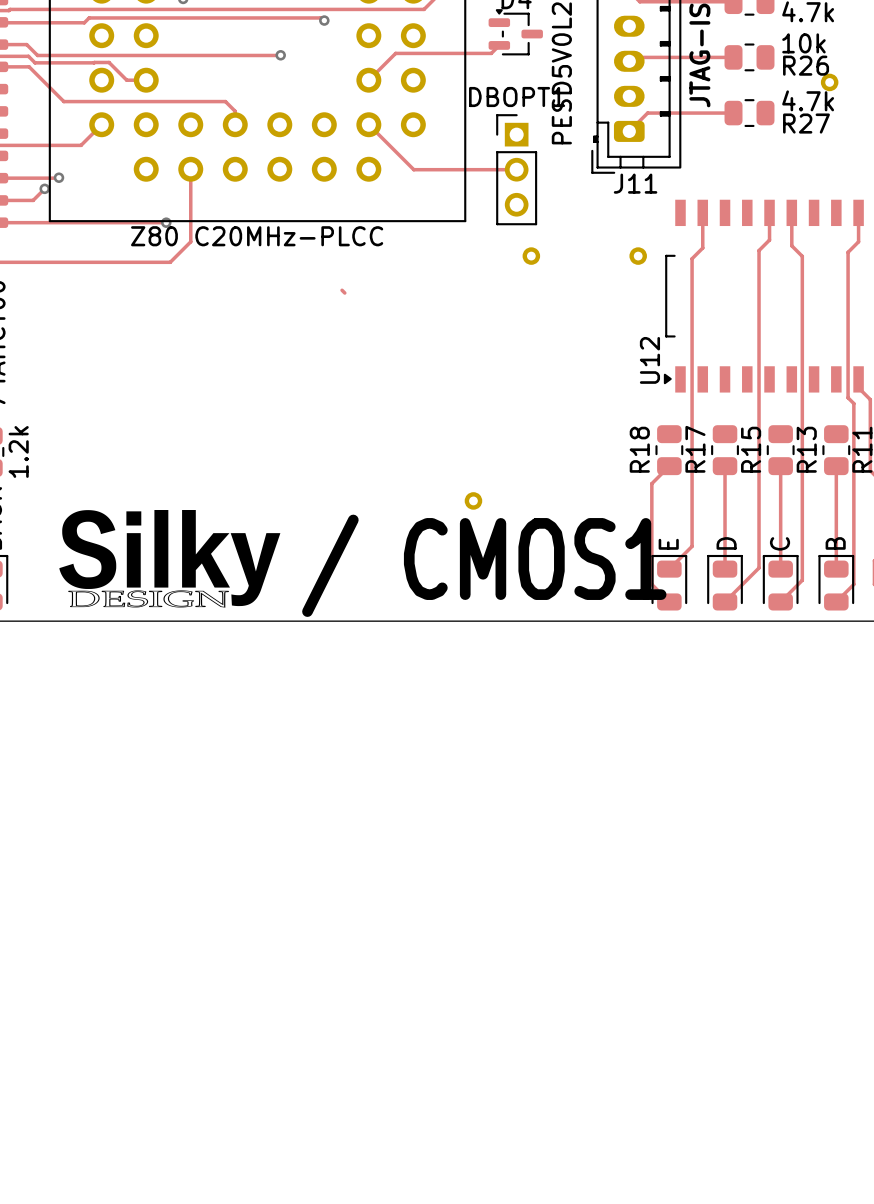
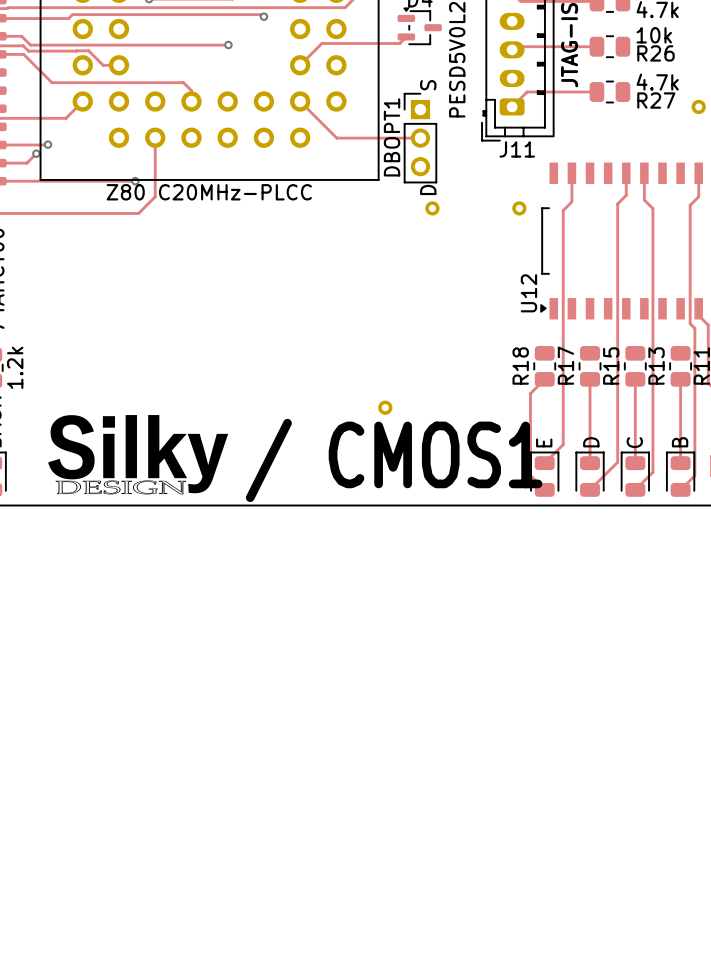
part position: (829, 82) -> (698, 106)
DBOPT1 name rotation: 0° (517, 97) -> 90° counterclockwise (392, 137)
DBOPT1 text: none -> S (428, 85)
DBOPT1 text: none -> D (428, 189)
track: (342, 290) (344, 293) -> none

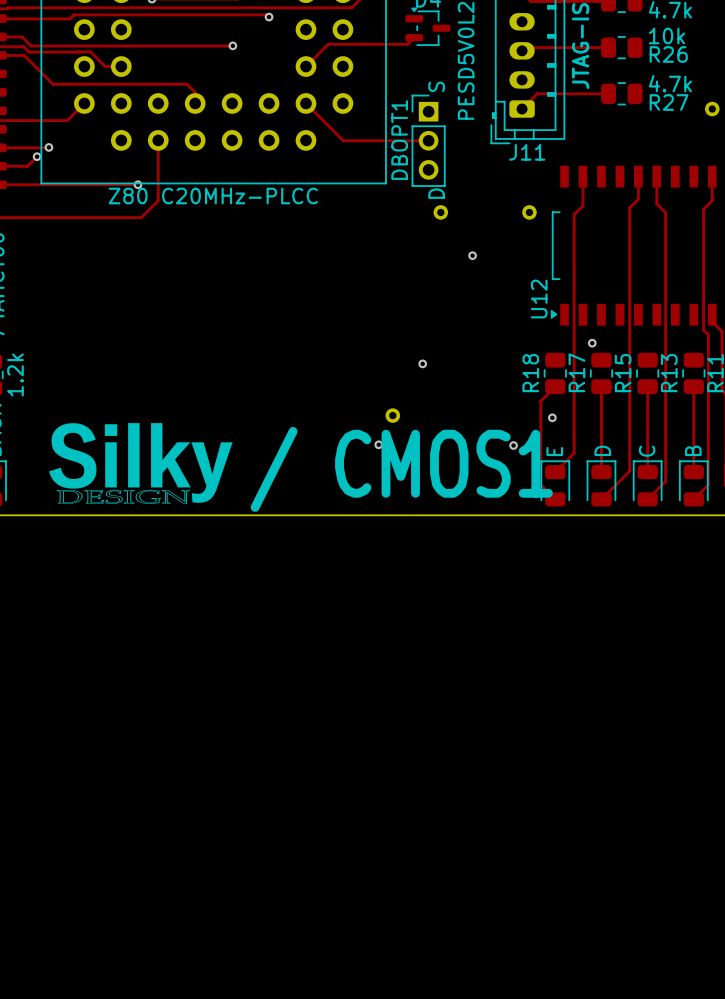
via: none -> (472, 255)
via: none -> (592, 343)
via: none -> (422, 363)
via: none -> (552, 417)
via: none -> (378, 444)
via: none -> (513, 445)

